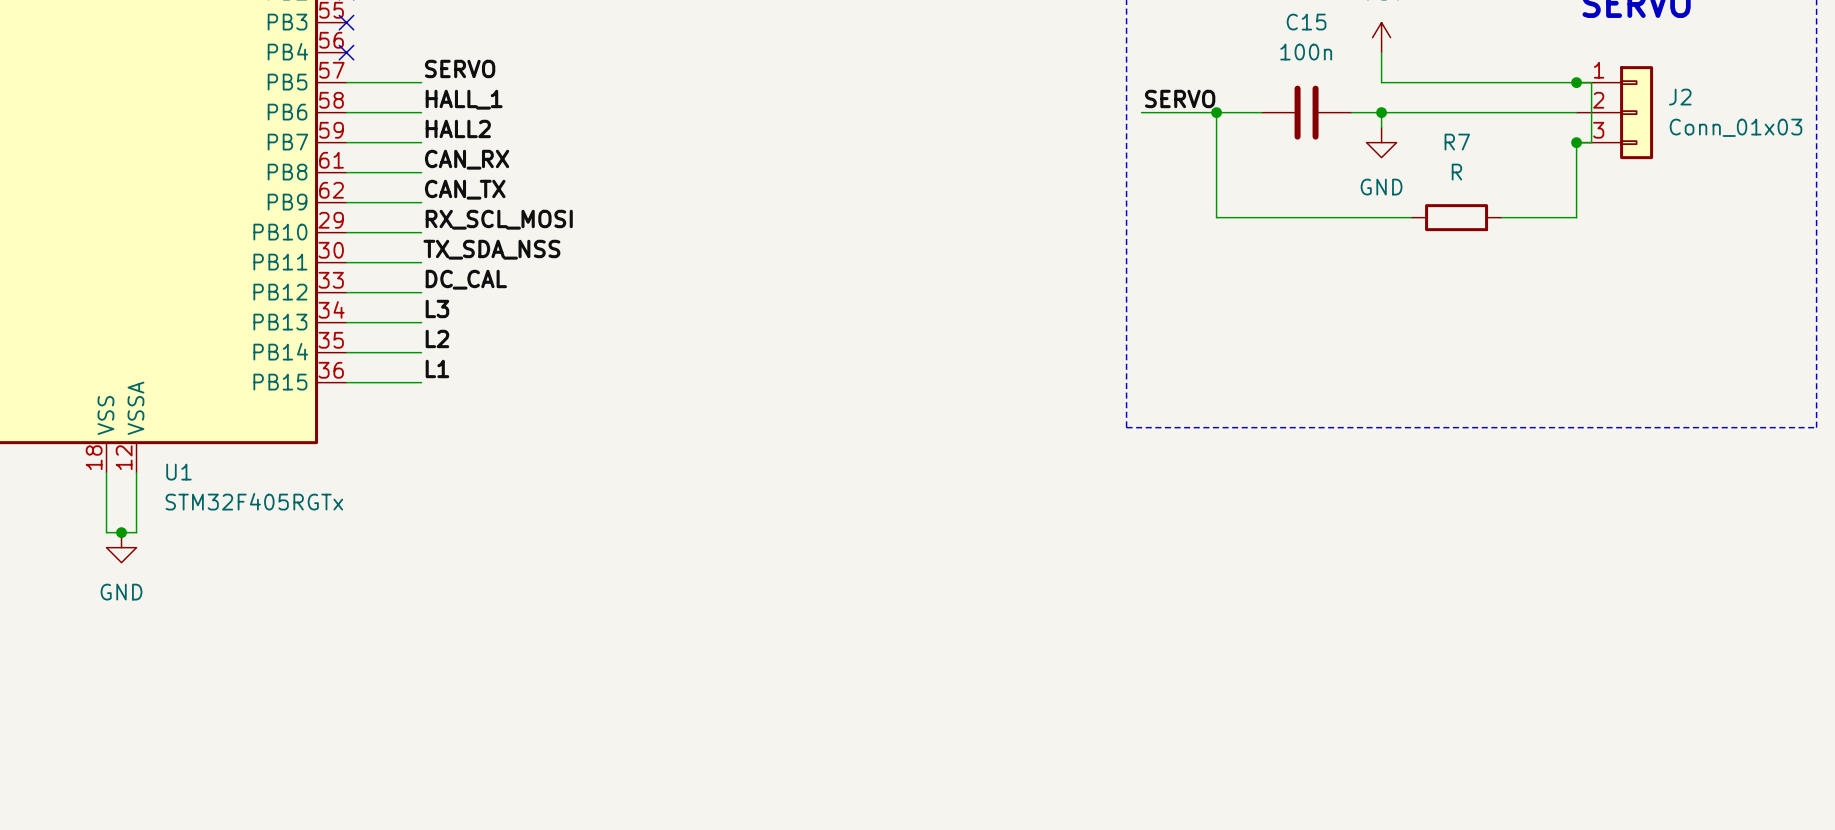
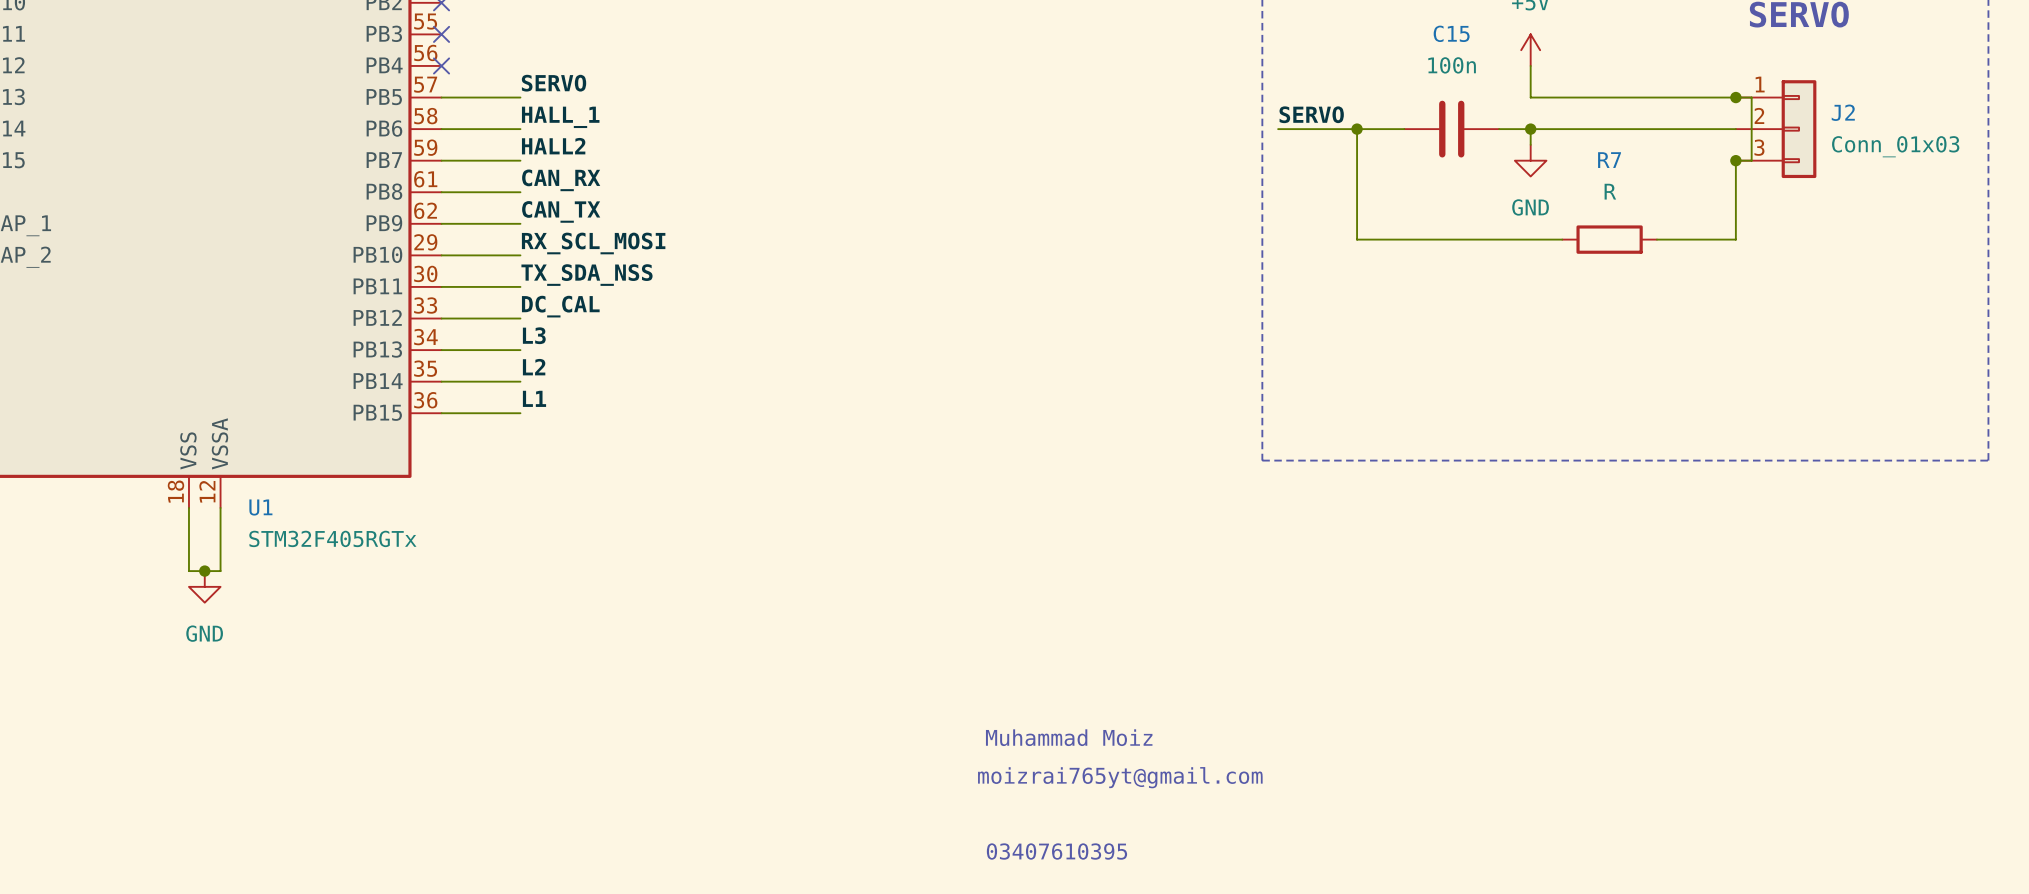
text: none -> Muhammad Moiz (1069, 737)
text: none -> moizrai765yt@gmail.com (1120, 777)
text: none -> 03407610395 (1056, 851)

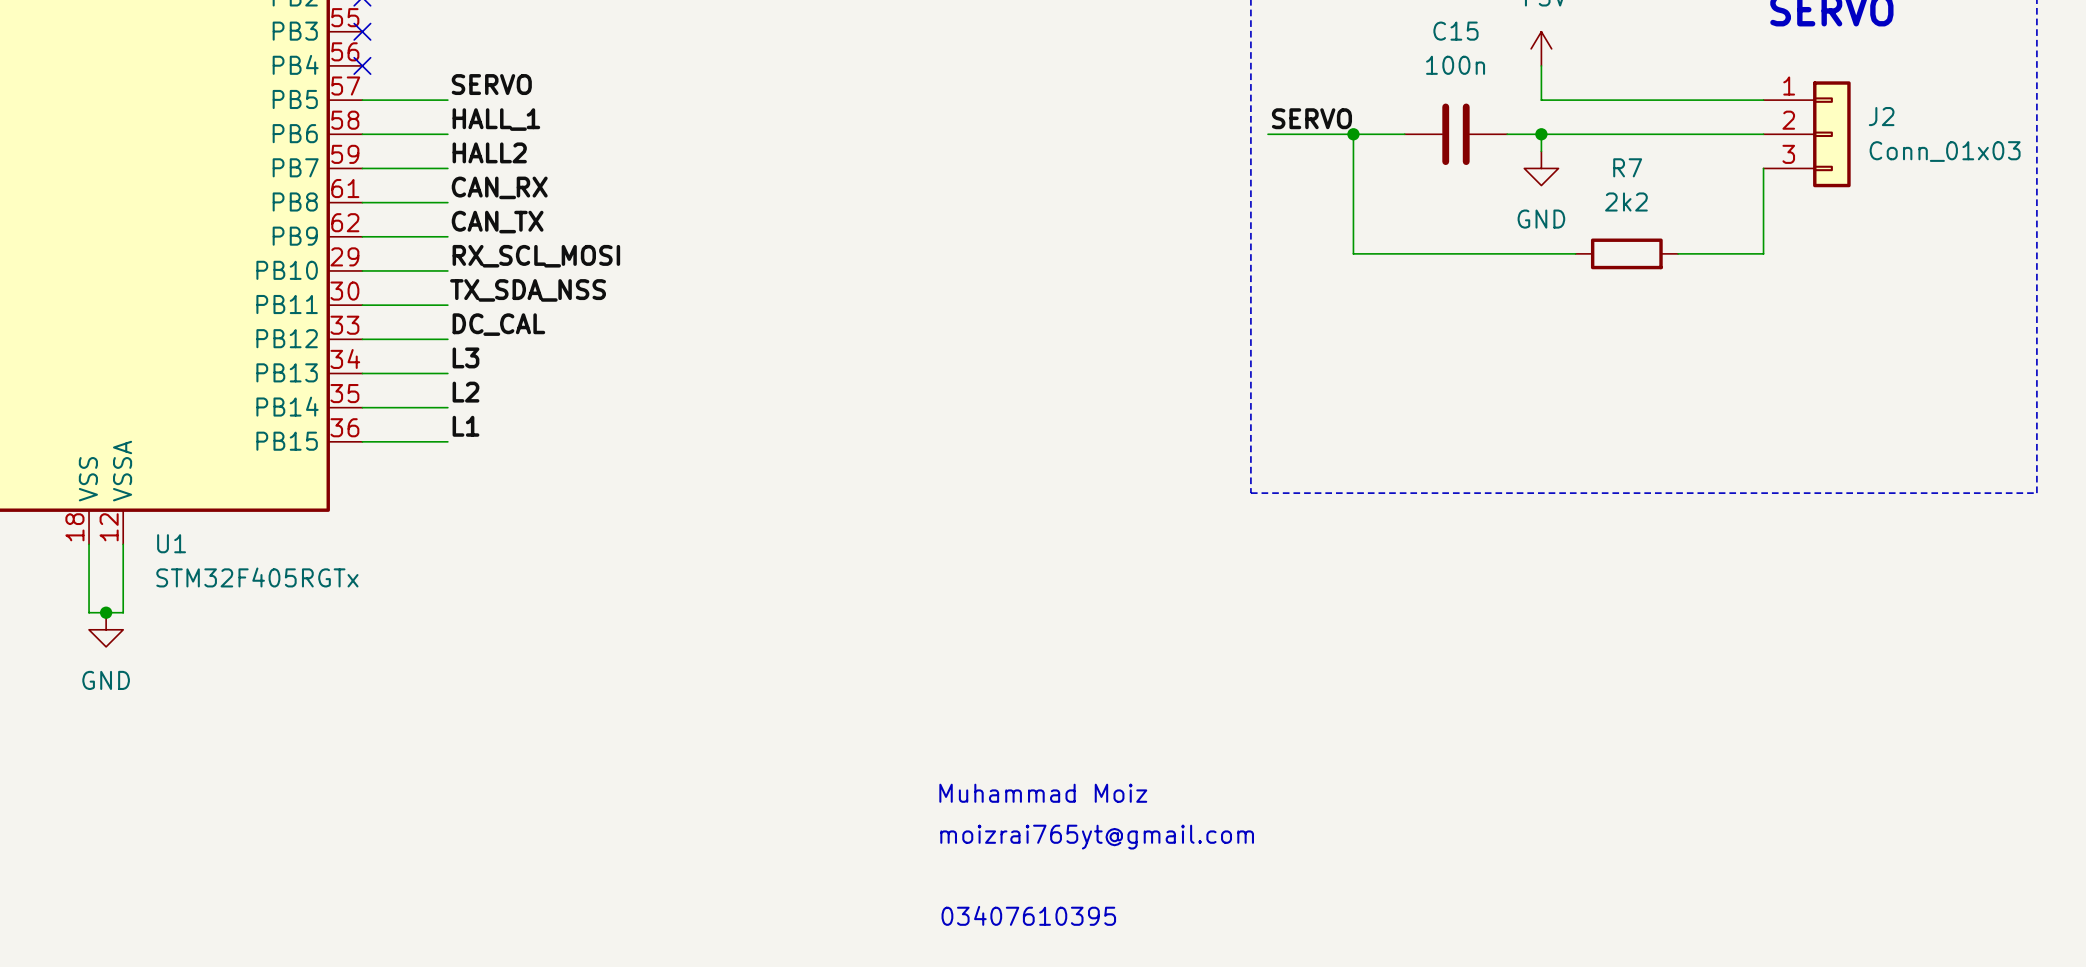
wire: (1735, 97) (1751, 97) (1751, 160) (1735, 160) -> none
junction: (1735, 97) -> none
junction: (1735, 160) -> none
R7 value: R (1610, 191) -> 2k2 (1626, 201)

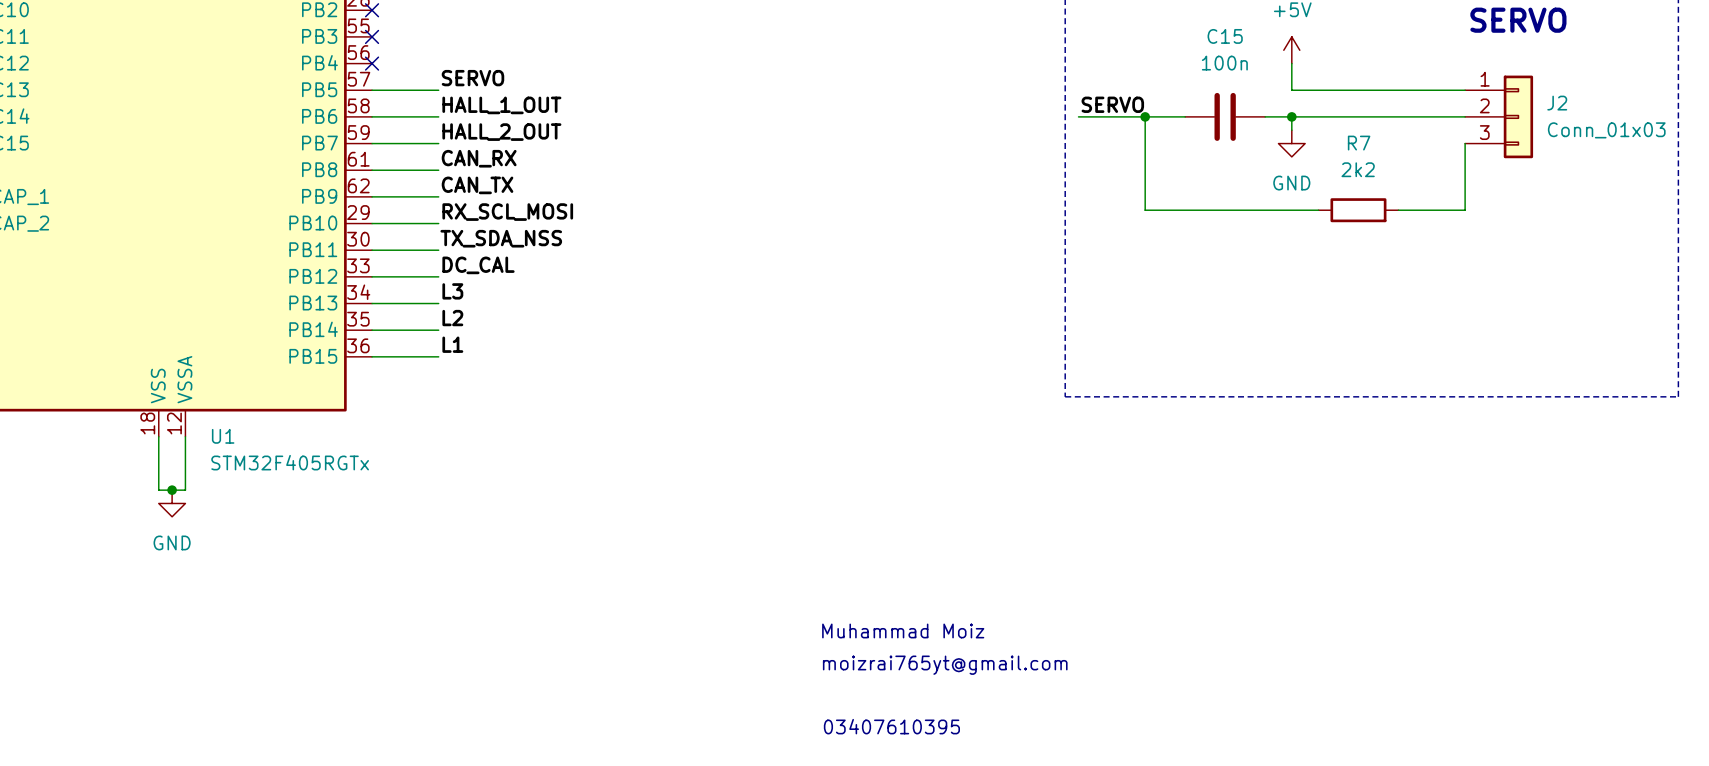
label: HALL_1 (496, 119) -> HALL_1_OUT (501, 105)
label: HALL2 (489, 152) -> HALL_2_OUT (501, 132)

